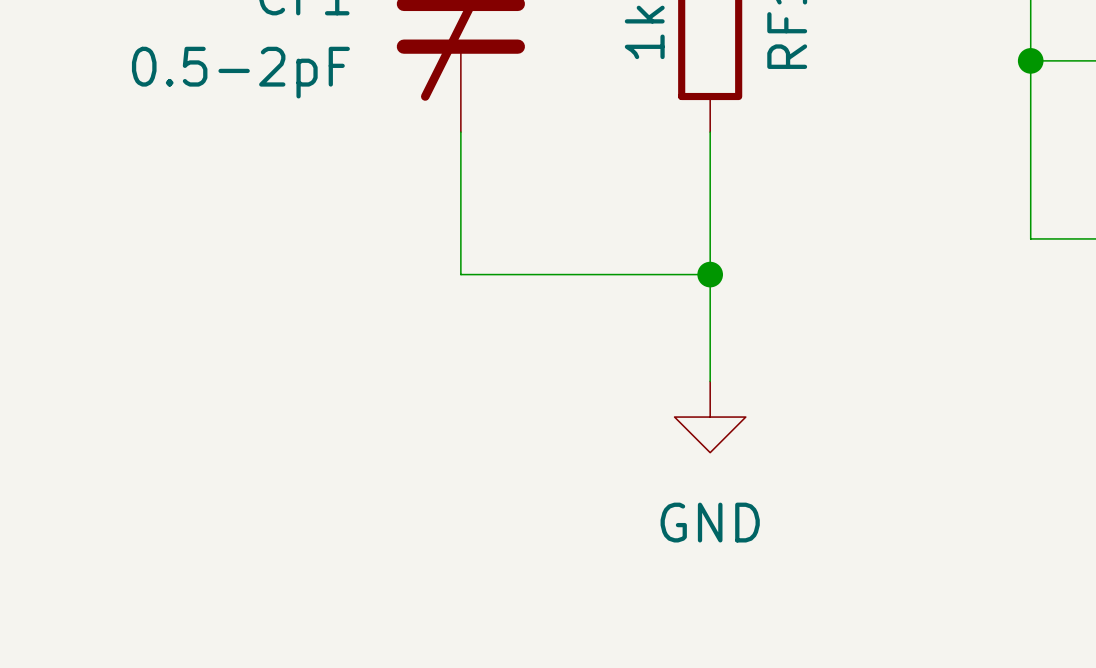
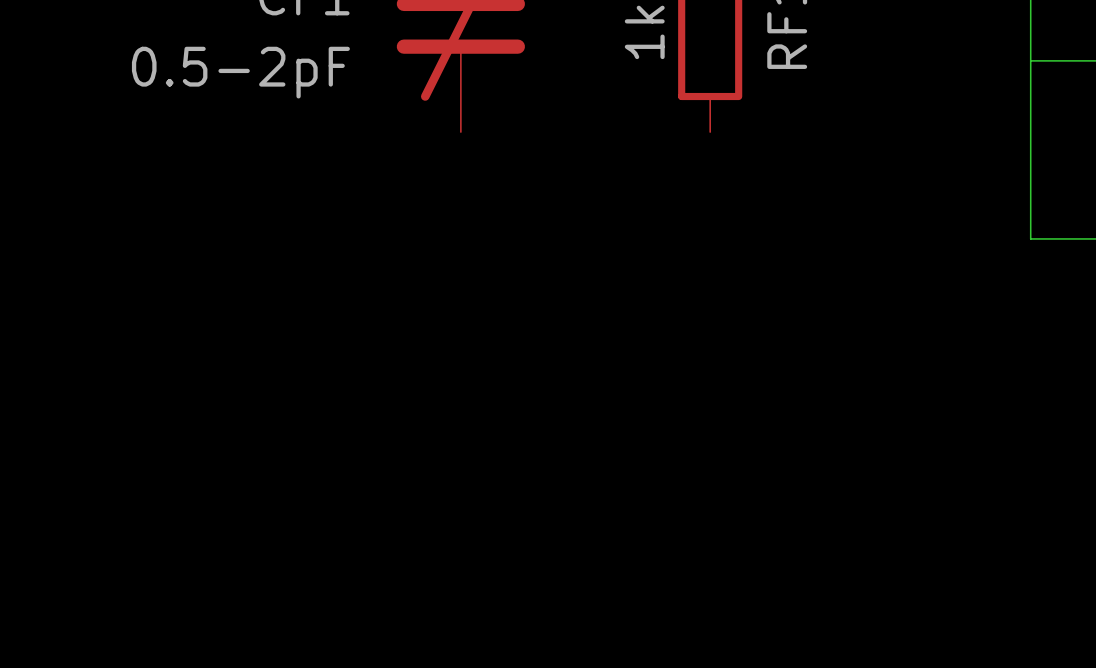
junction: (1030, 60) -> none
wire: (460, 132) (460, 274) (710, 274) -> none
wire: (710, 132) (710, 381) -> none
junction: (710, 274) -> none
power symbol: GND (710, 417) -> none

